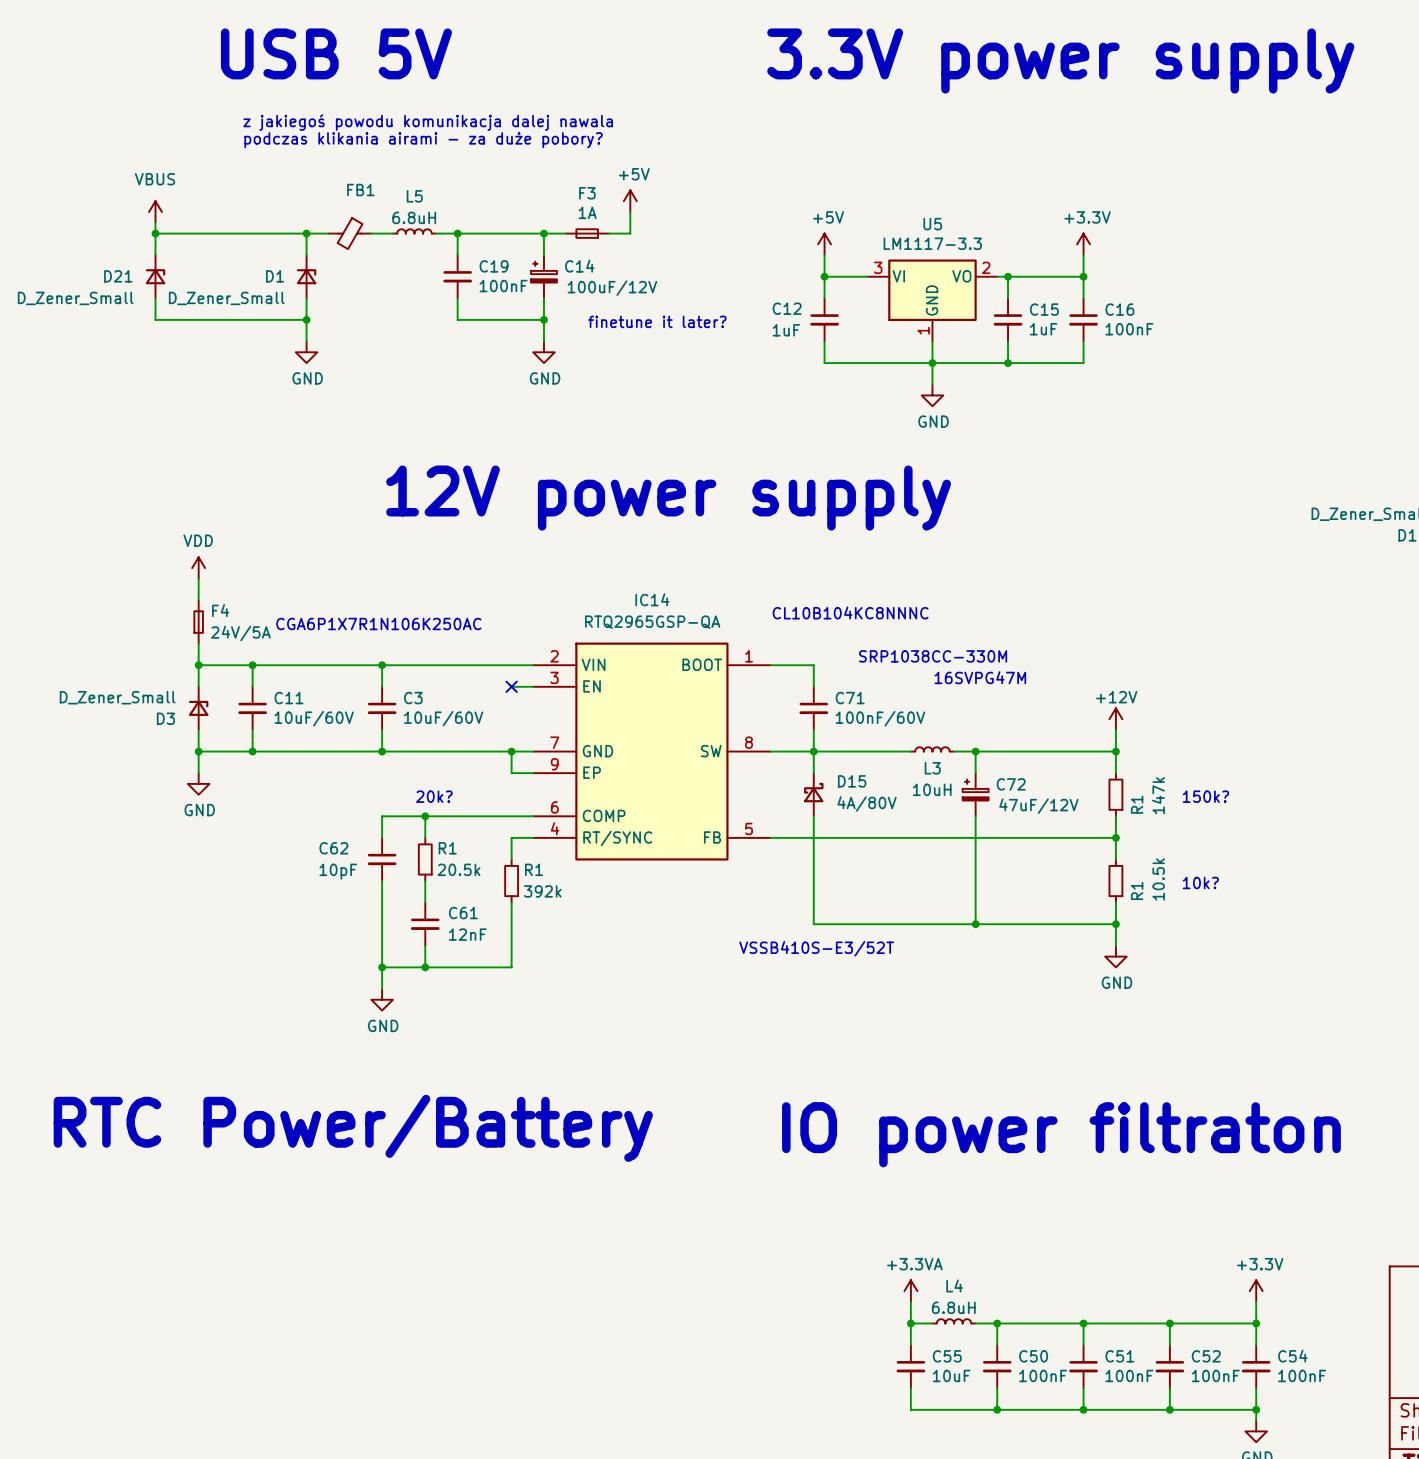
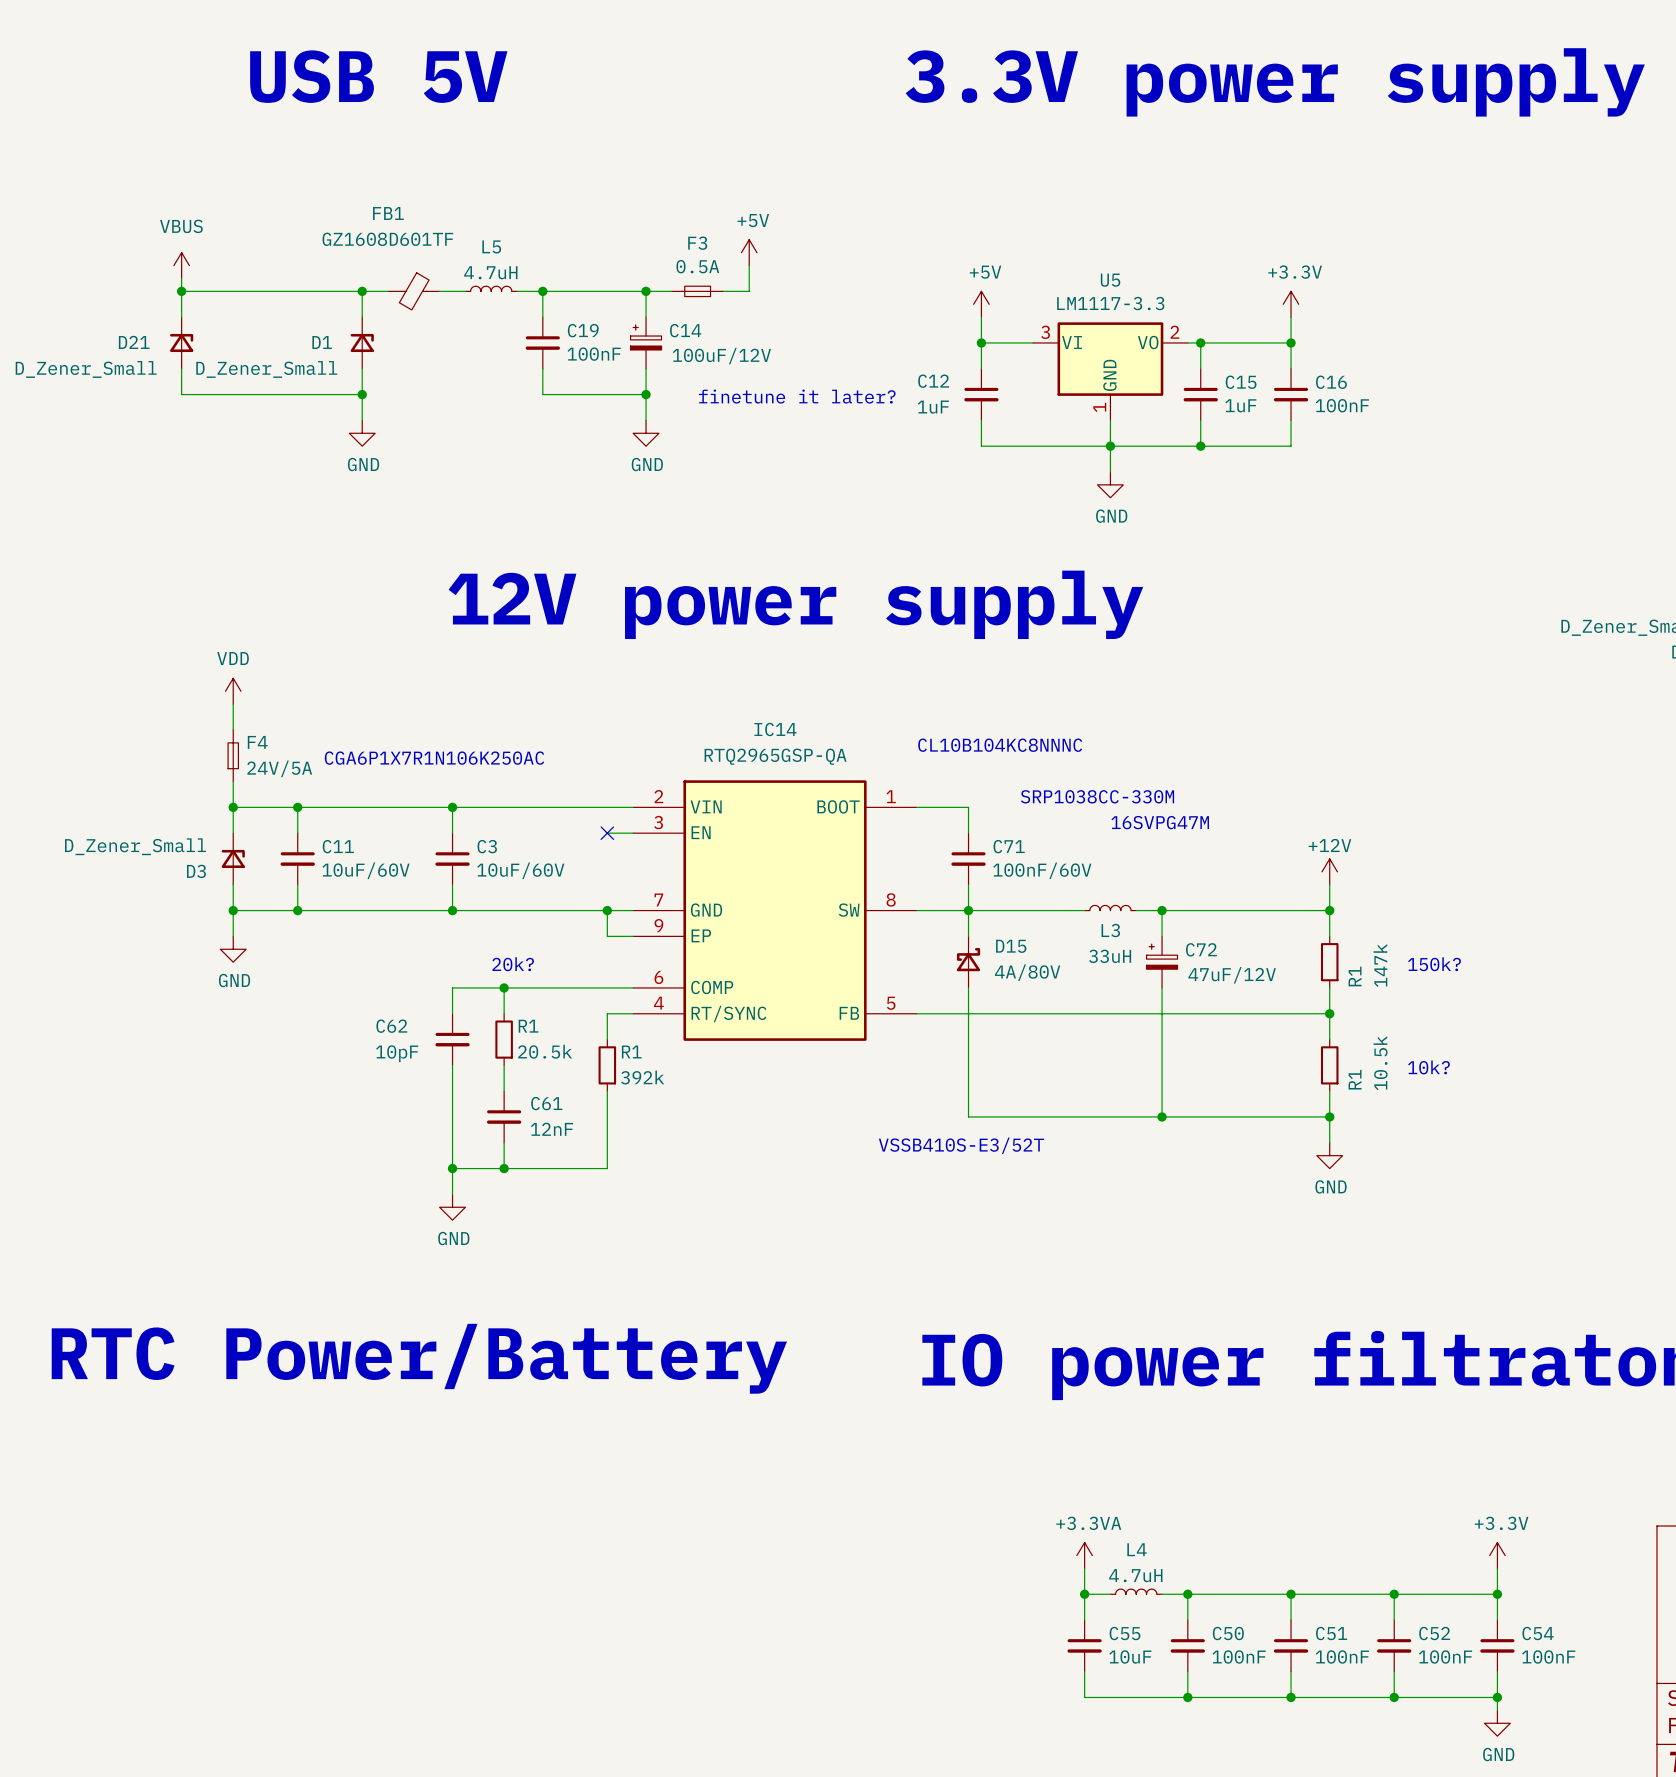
text: z jakiegoś powodu komunikacja dalej nawala (428, 122) -> none
text: podczas klikania airami - za duże pobory? (423, 140) -> none
FB1 value: none -> GZ1608D601TF (387, 239)
FB1 name position: FB1 (360, 190) -> FB1 (388, 213)
F3 value: 1A (587, 212) -> 0.5A (697, 266)
L5 value: 6.8uH (414, 217) -> 4.7uH (490, 272)
L3 value: 10uH (932, 789) -> 33uH (1110, 956)
L4 value: 6.8uH (953, 1307) -> 4.7uH (1135, 1575)

